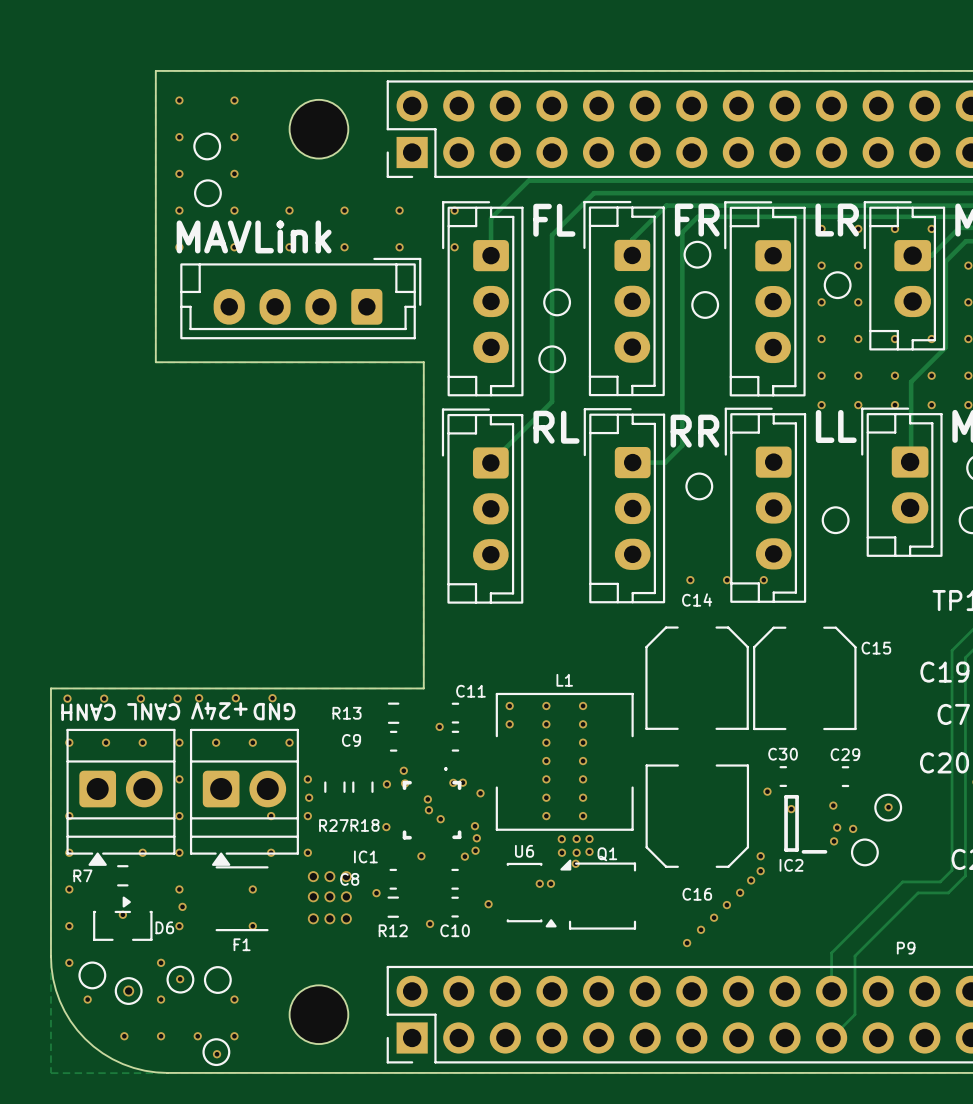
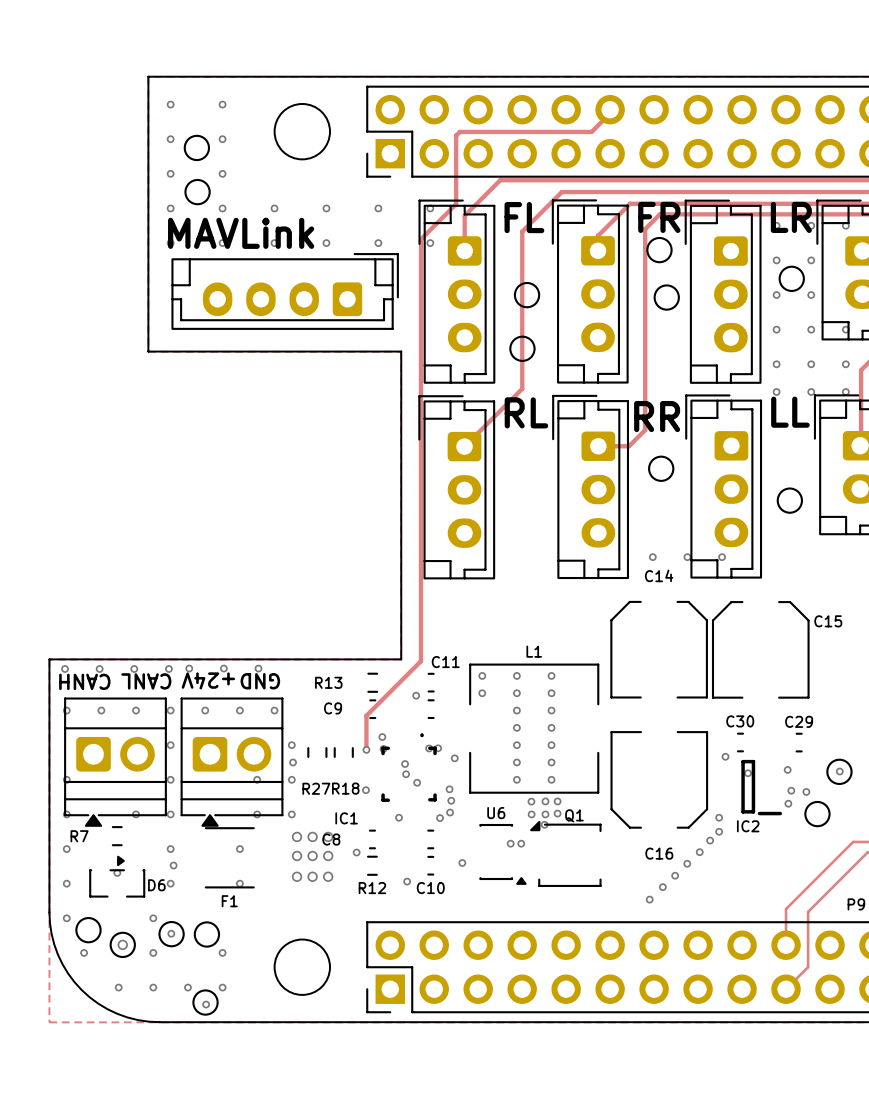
track: none -> (612, 111) (591, 131) (459, 131) (456, 135) (456, 204) (420, 239) (420, 661) (366, 715) (366, 749)

